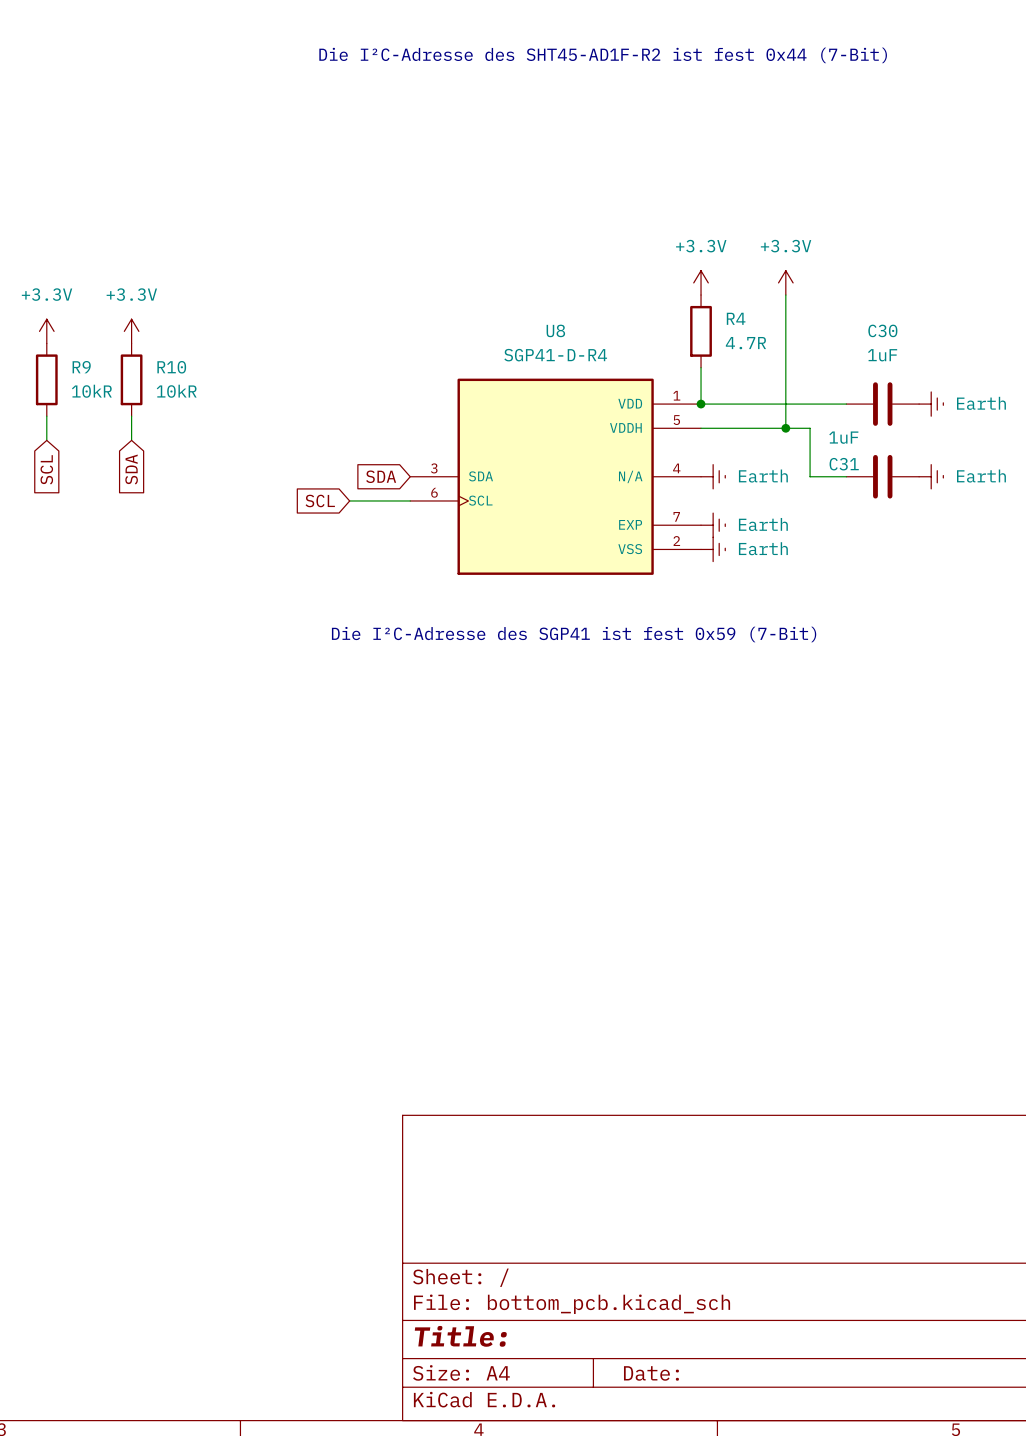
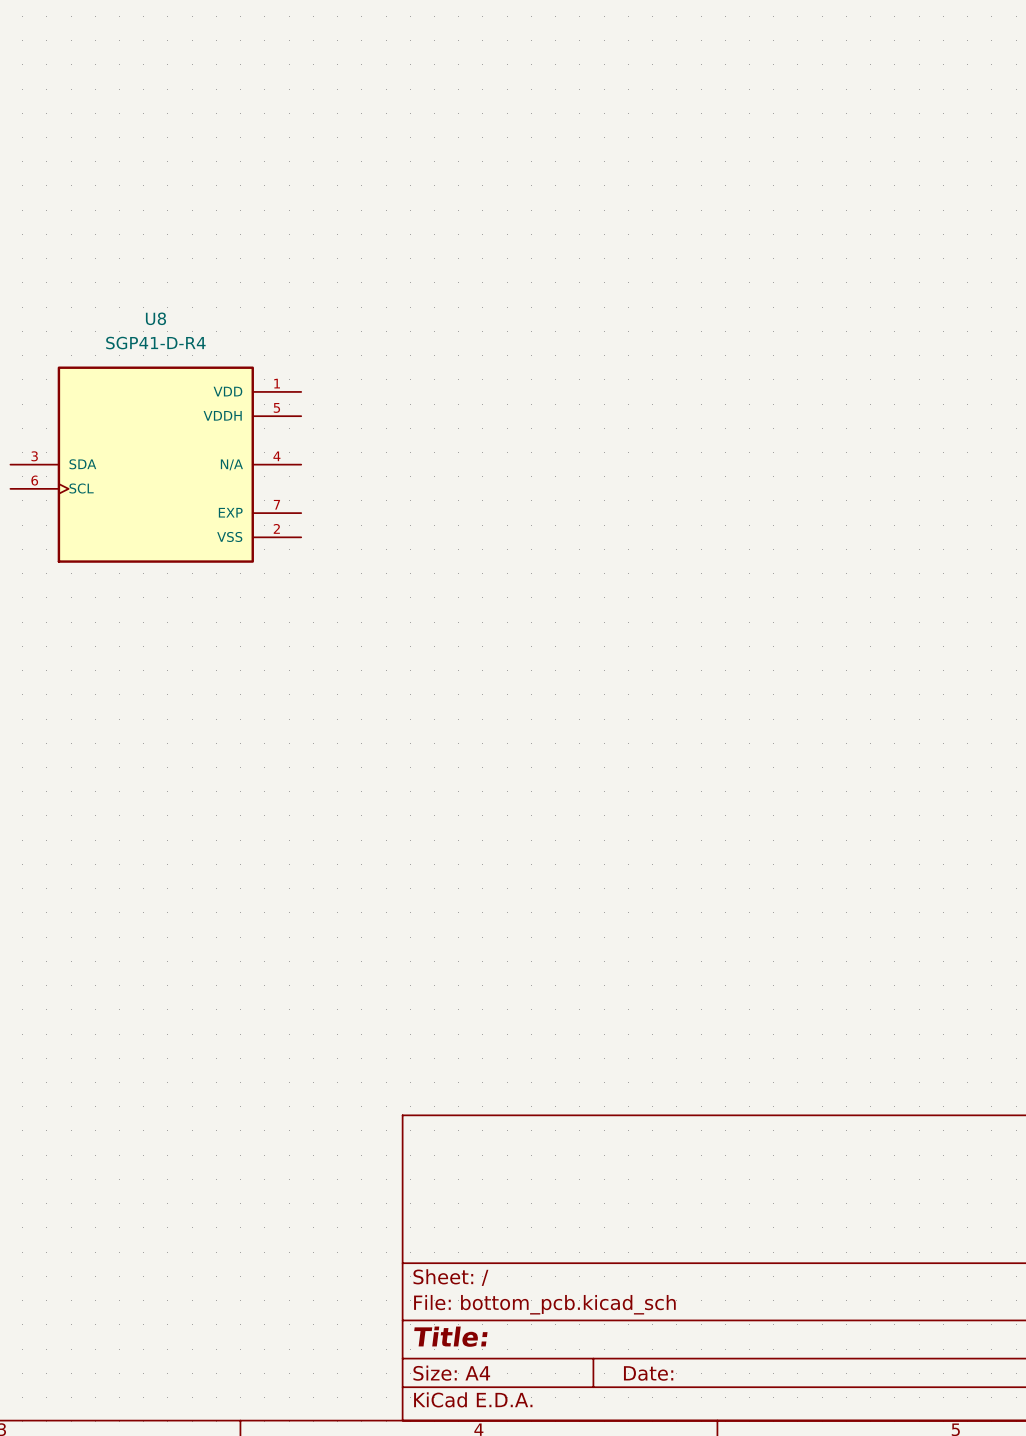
text: Die I²C-Adresse des SHT45-AD1F-R2 ist fest 0x44 (7-Bit) (603, 55) -> none
power symbol: +3.3V (701, 282) -> none
power symbol: +3.3V (785, 282) -> none
wire: (785, 295) (785, 428) -> none
power symbol: +3.3V (46, 331) -> none
power symbol: +3.3V (131, 331) -> none
R4: 4.7R (701, 331) -> none
wire: (701, 367) (701, 404) (846, 404) -> none
R9: 10kR (46, 379) -> none
R10: 10kR (131, 379) -> none
junction: (701, 404) -> none
C30: 1uF (882, 404) -> none
power symbol: Earth (931, 404) -> none
wire: (46, 416) (46, 440) -> none
wire: (701, 428) (810, 428) (810, 476) (846, 476) -> none
junction: (785, 428) -> none
global label: SCL (46, 469) -> none
global label: SDA (131, 469) -> none
global label: SDA (381, 476) -> none
U8 position: (555, 476) -> (155, 464)
power symbol: Earth (713, 476) -> none
C31: 1uF (882, 476) -> none
power symbol: Earth (931, 476) -> none
global label: SCL (320, 500) -> none
wire: (349, 500) (410, 500) -> none
power symbol: Earth (713, 525) -> none
power symbol: Earth (713, 549) -> none
text: Die I²C-Adresse des SGP41 ist fest 0x59 (7-Bit) (574, 634) -> none

